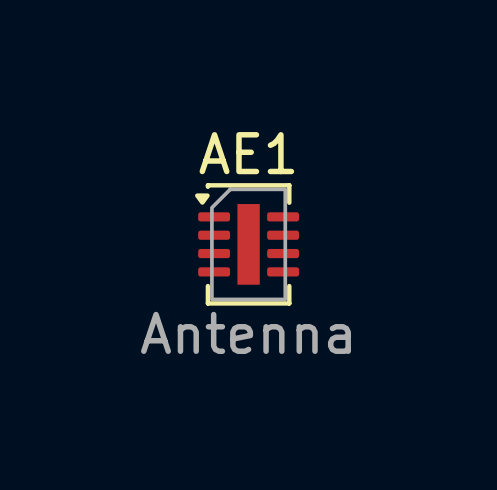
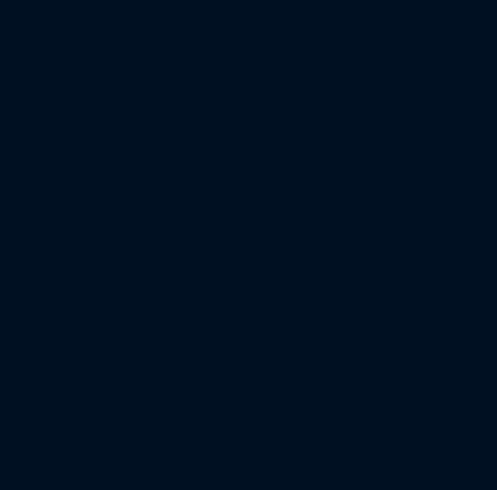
AE1: Antenna (247, 244) -> none

